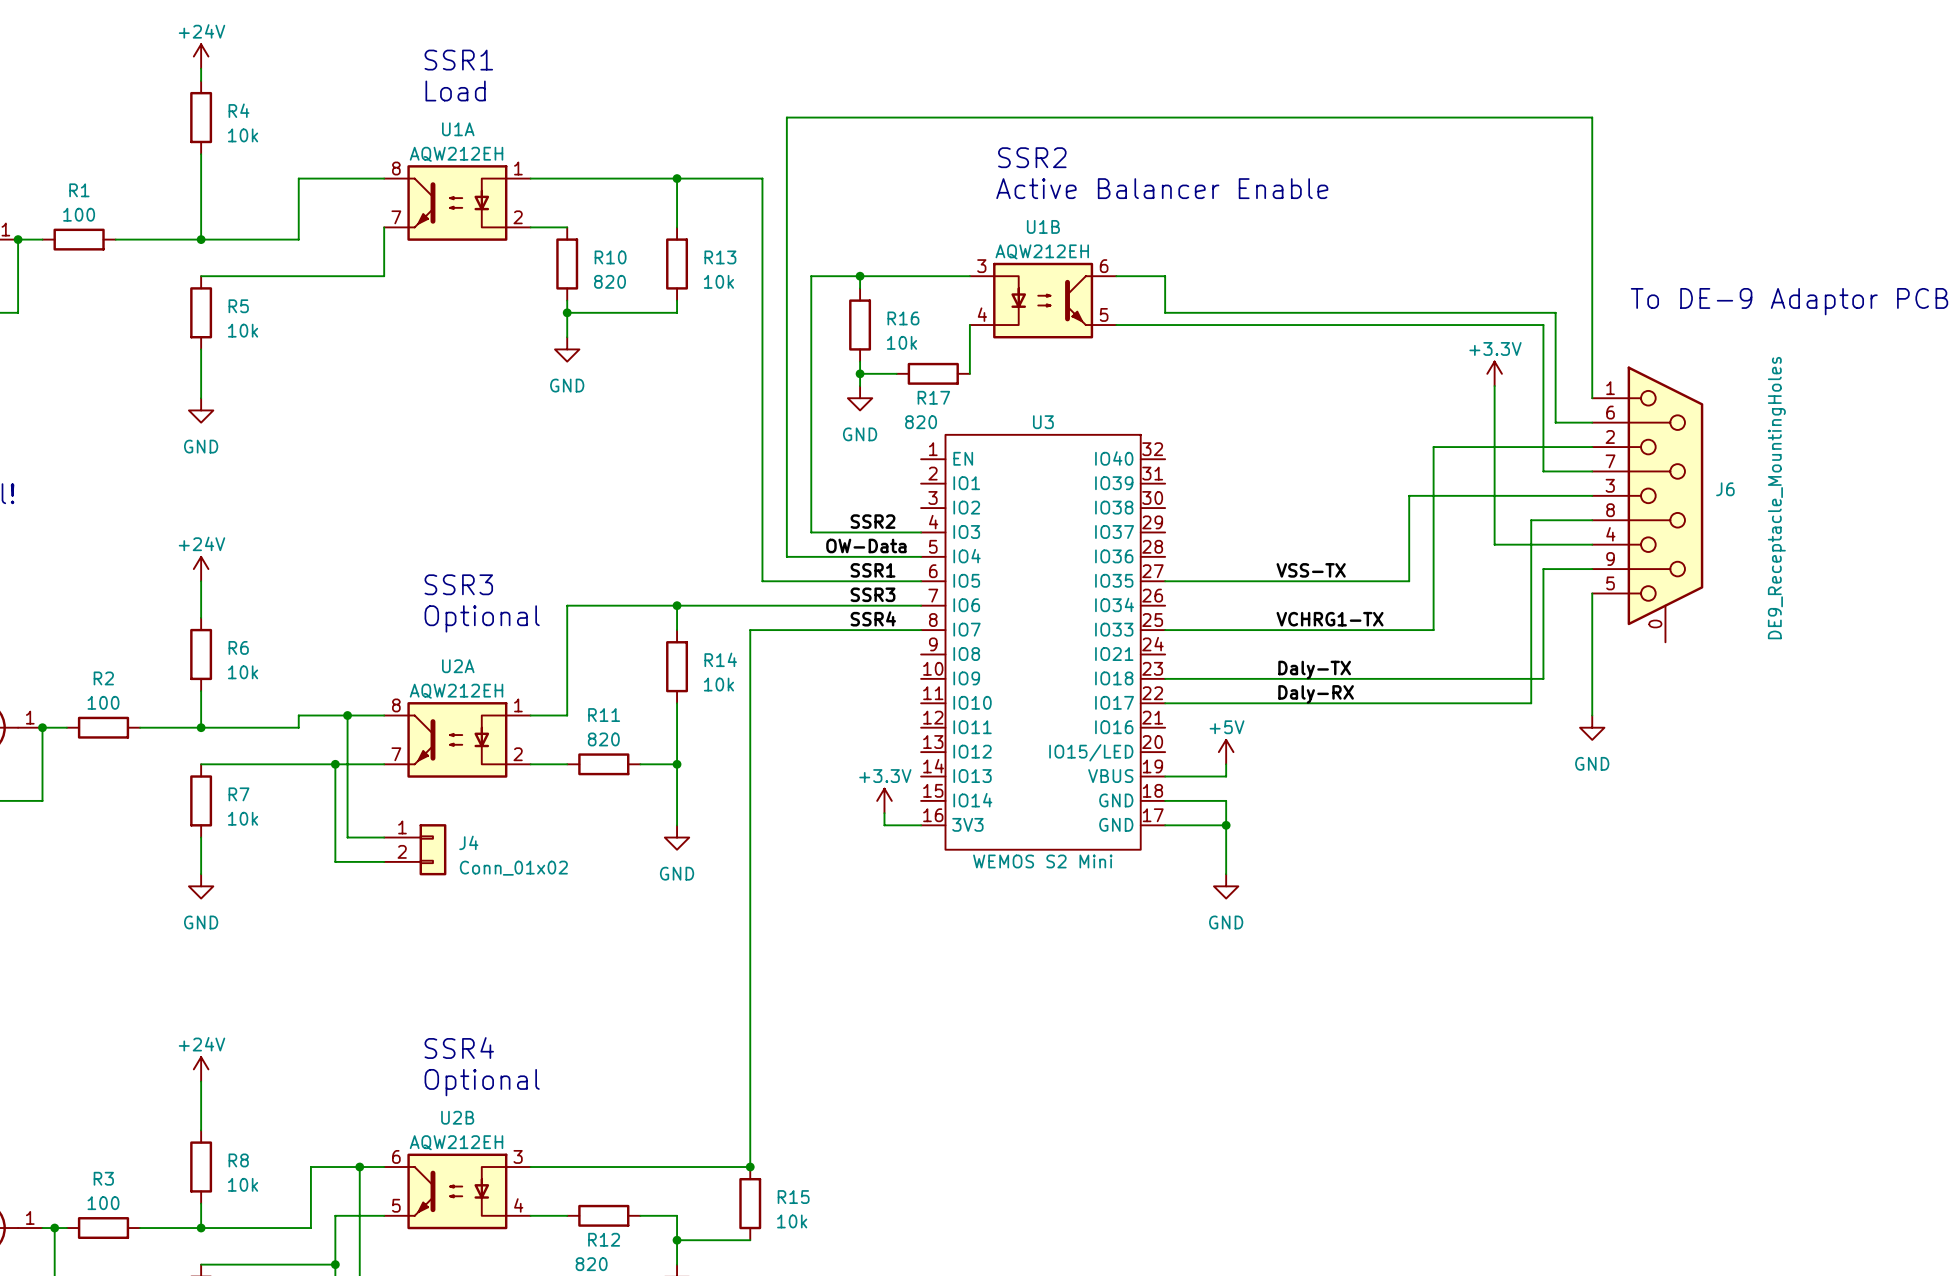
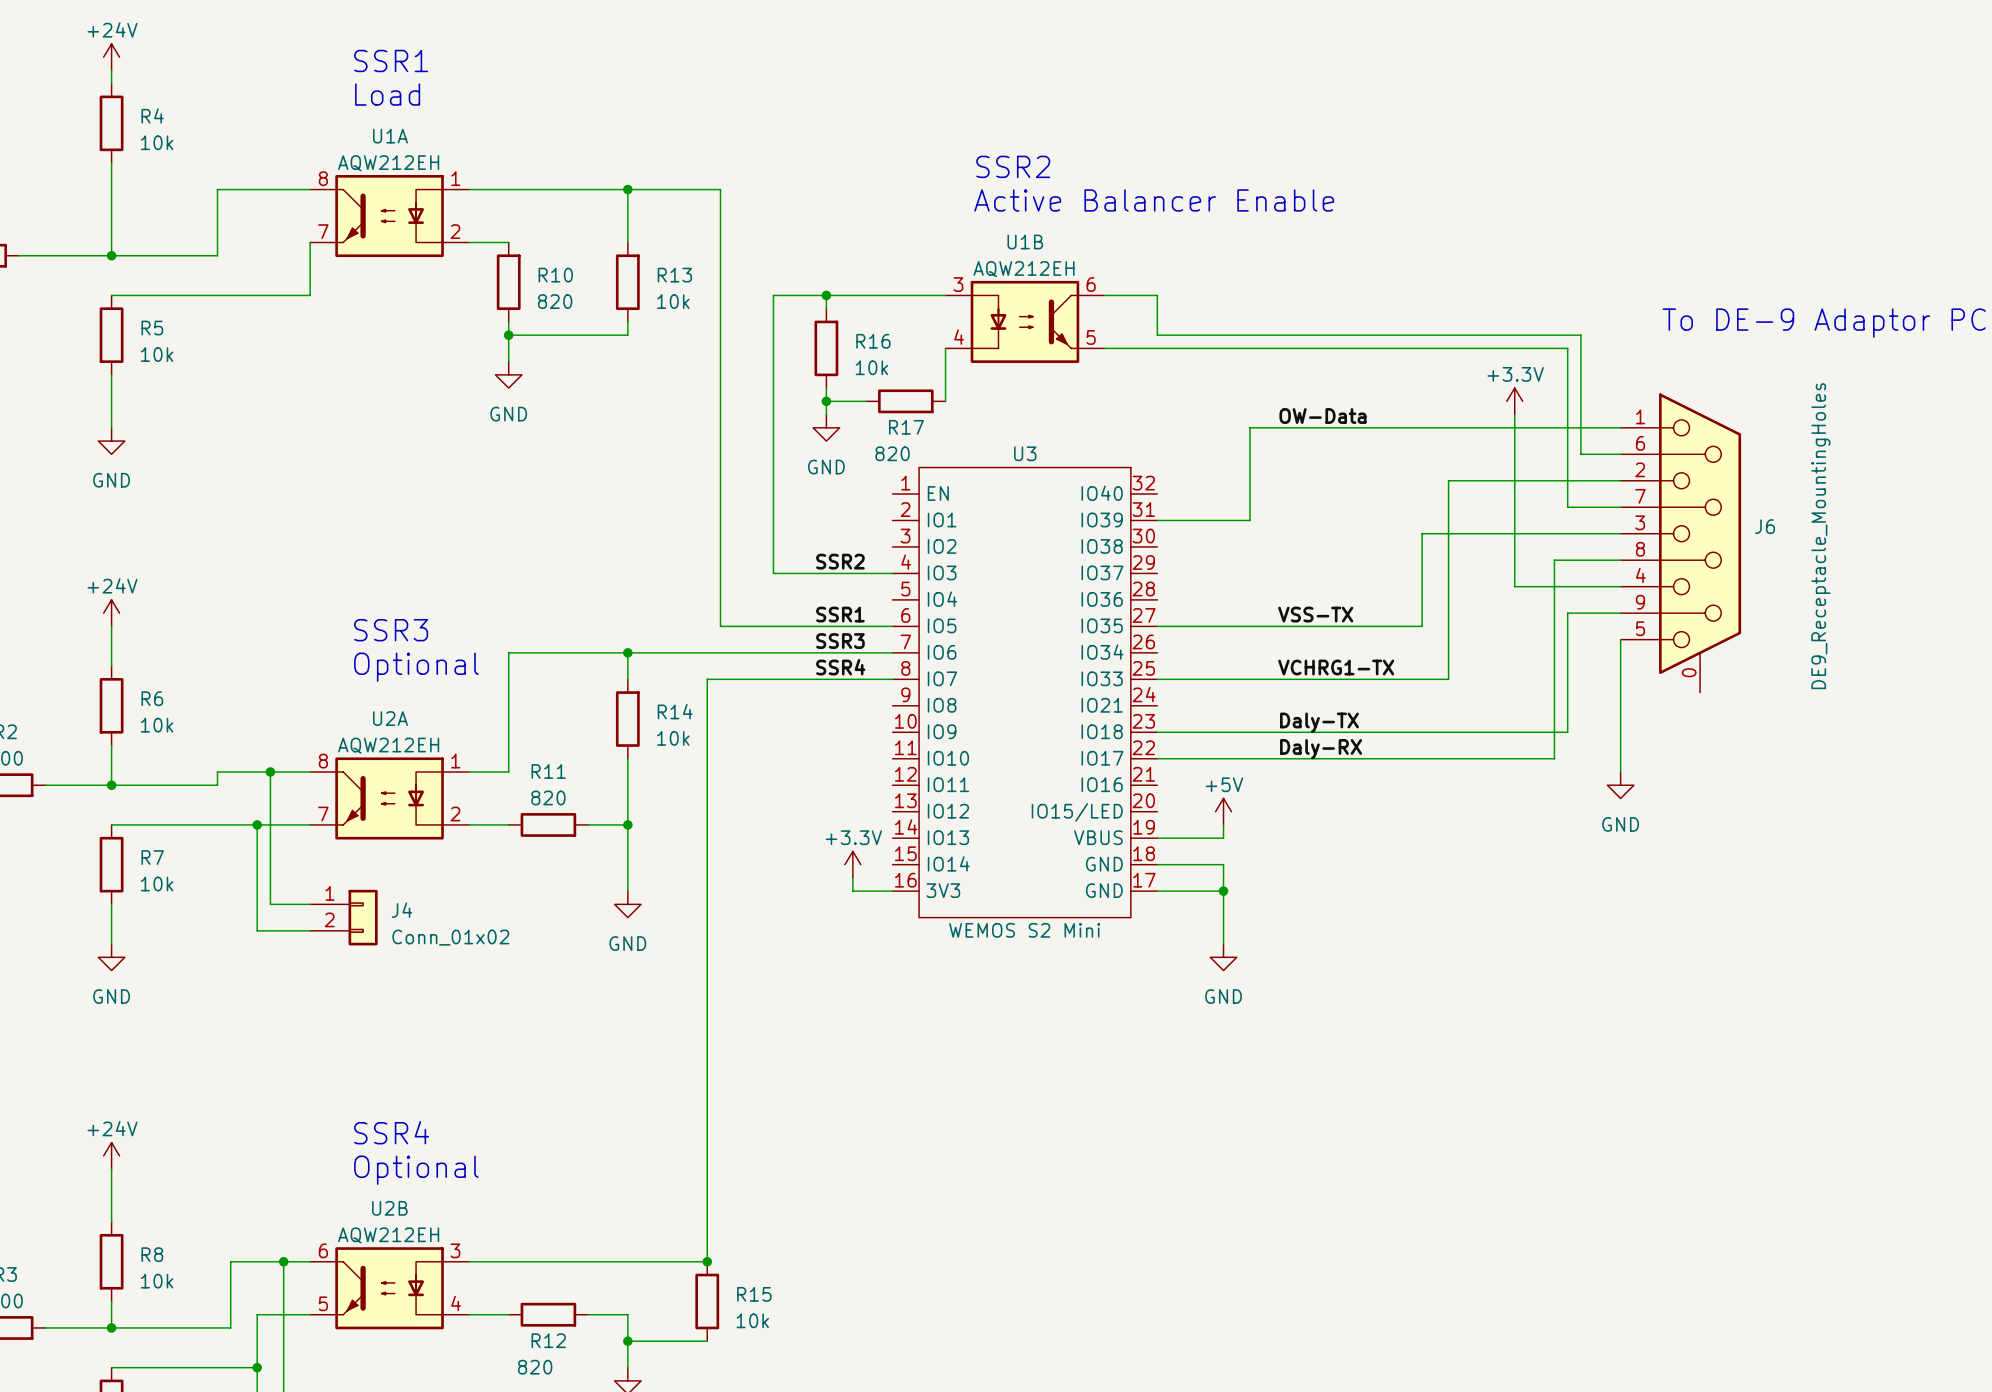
label: none -> OW-Data (1322, 416)
wire: (1592, 398) (1592, 117) (786, 117) (786, 556) (921, 556) -> (1620, 427) (1249, 427) (1249, 520) (1157, 520)
label: OW-Data (866, 545) -> none

